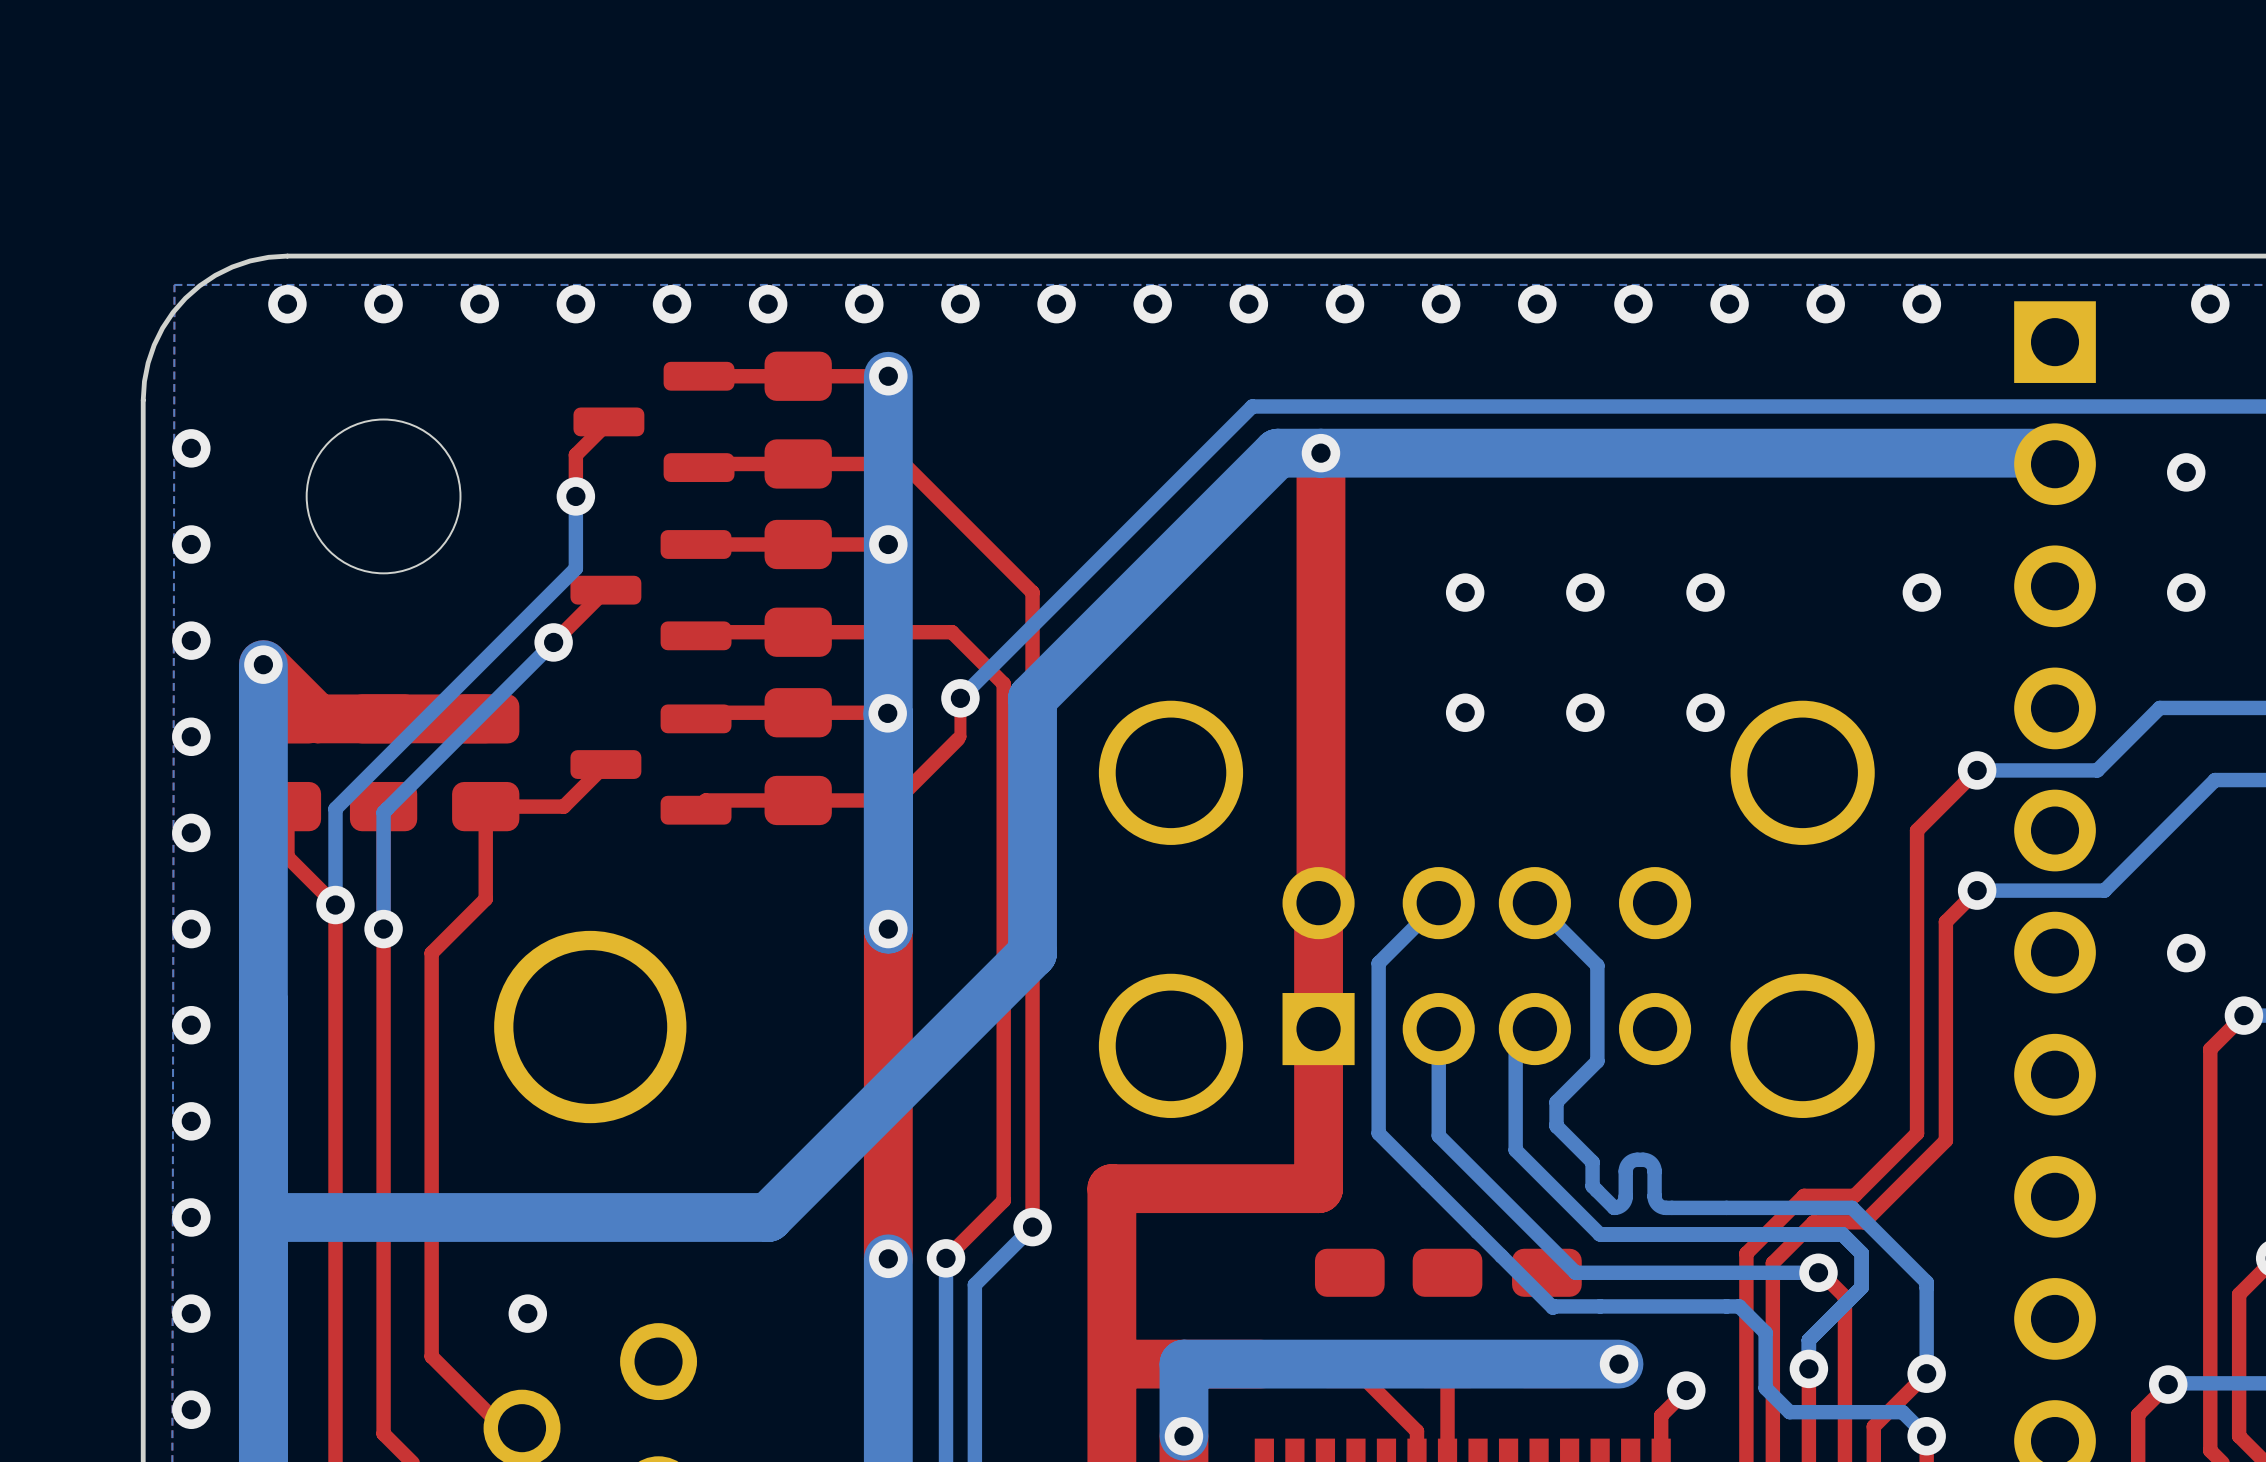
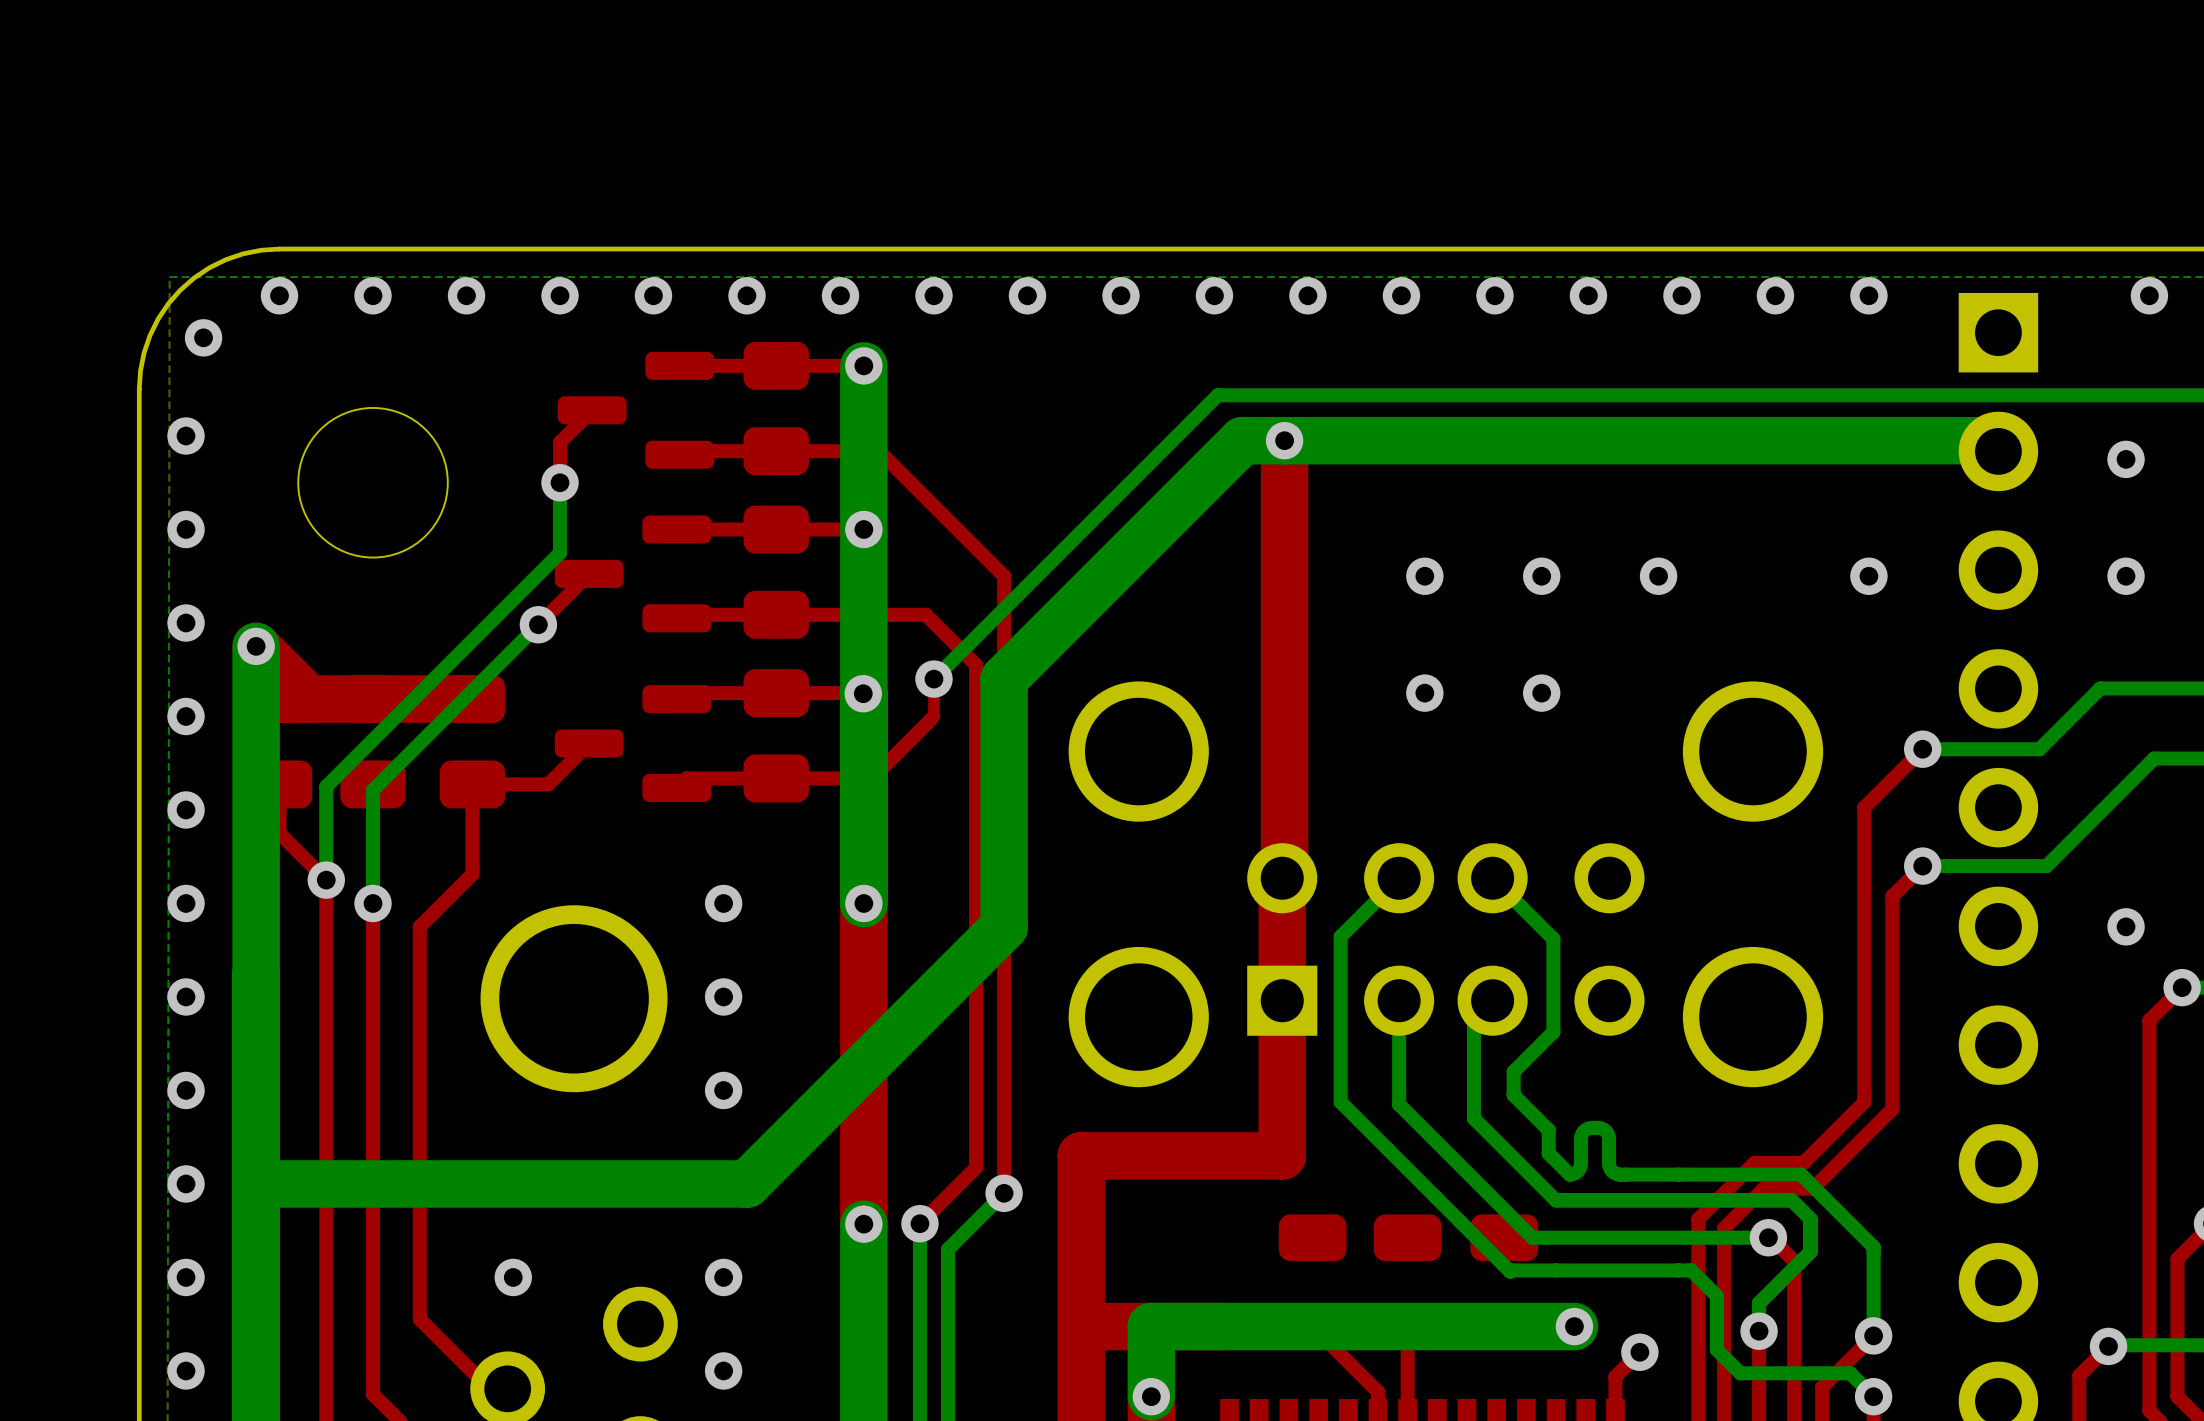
via: none -> (203, 337)
via: (1705, 712) -> none
via: none -> (723, 903)
via: none -> (723, 996)
via: none -> (723, 1090)
via: none -> (723, 1277)
via: none -> (723, 1370)

